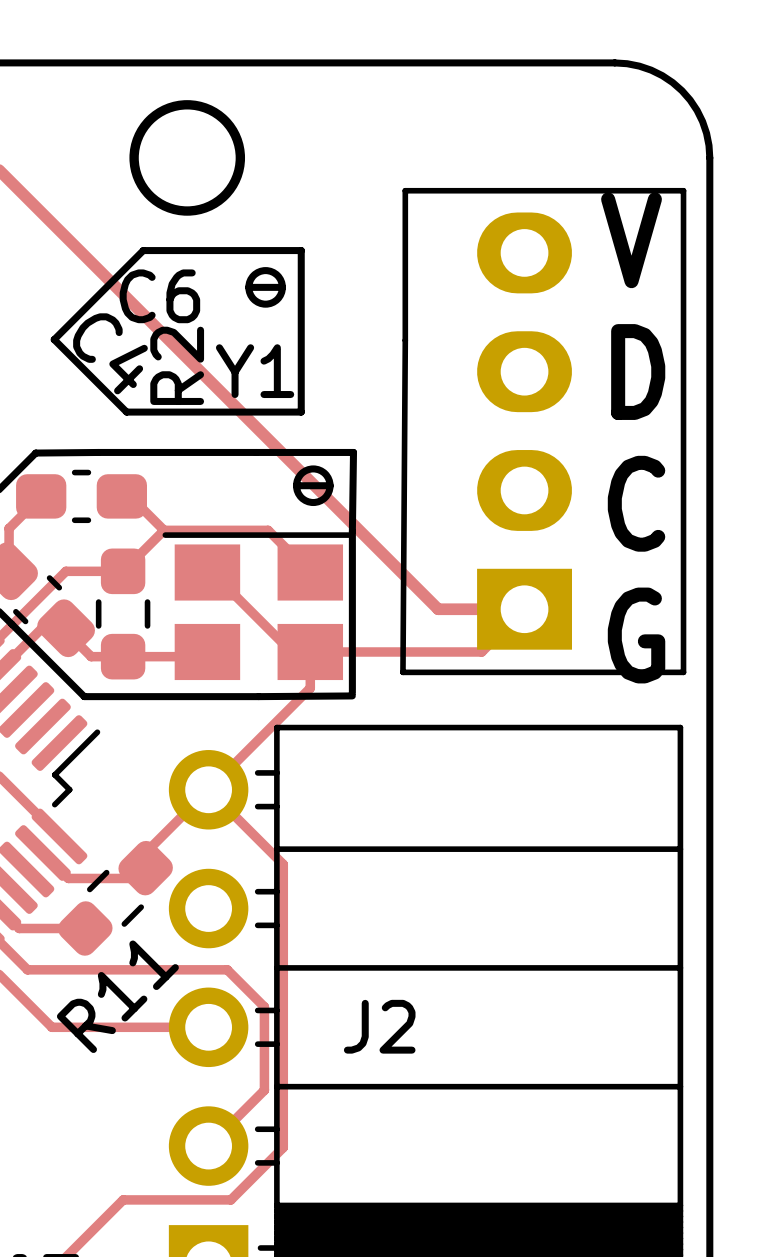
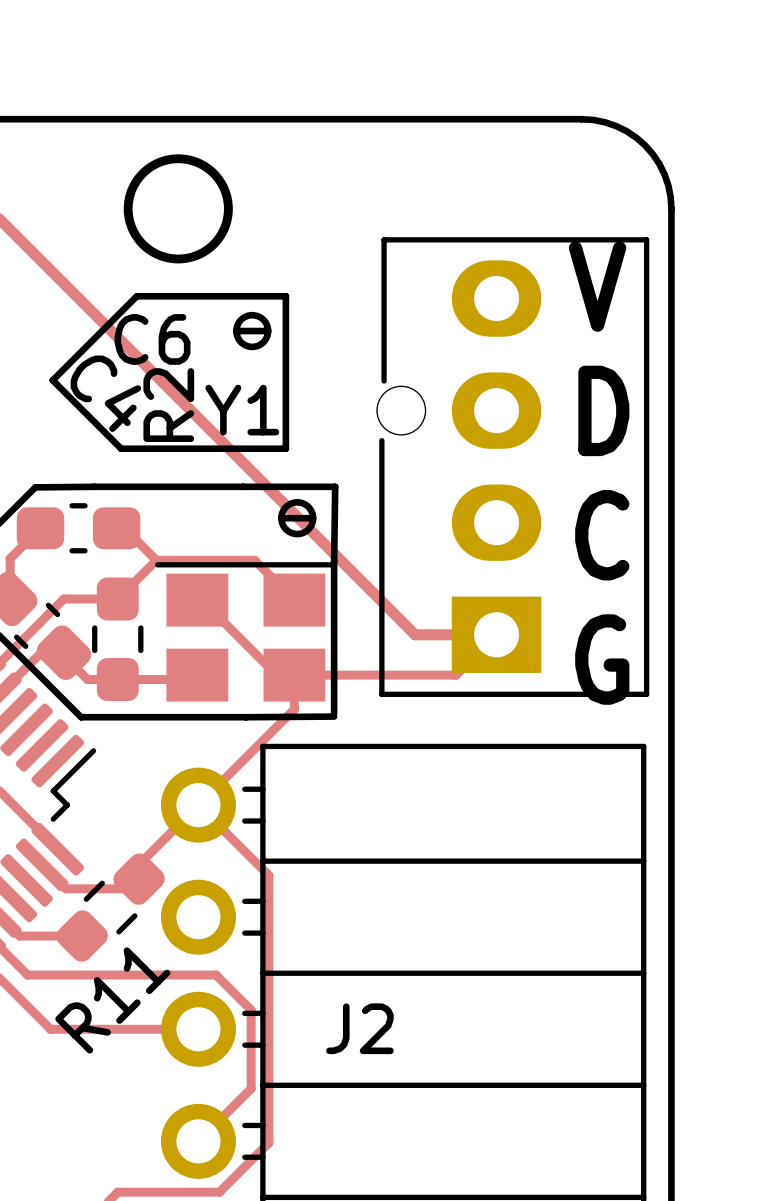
part footprint: [400, 187, 687, 676] -> [377, 237, 650, 697]

